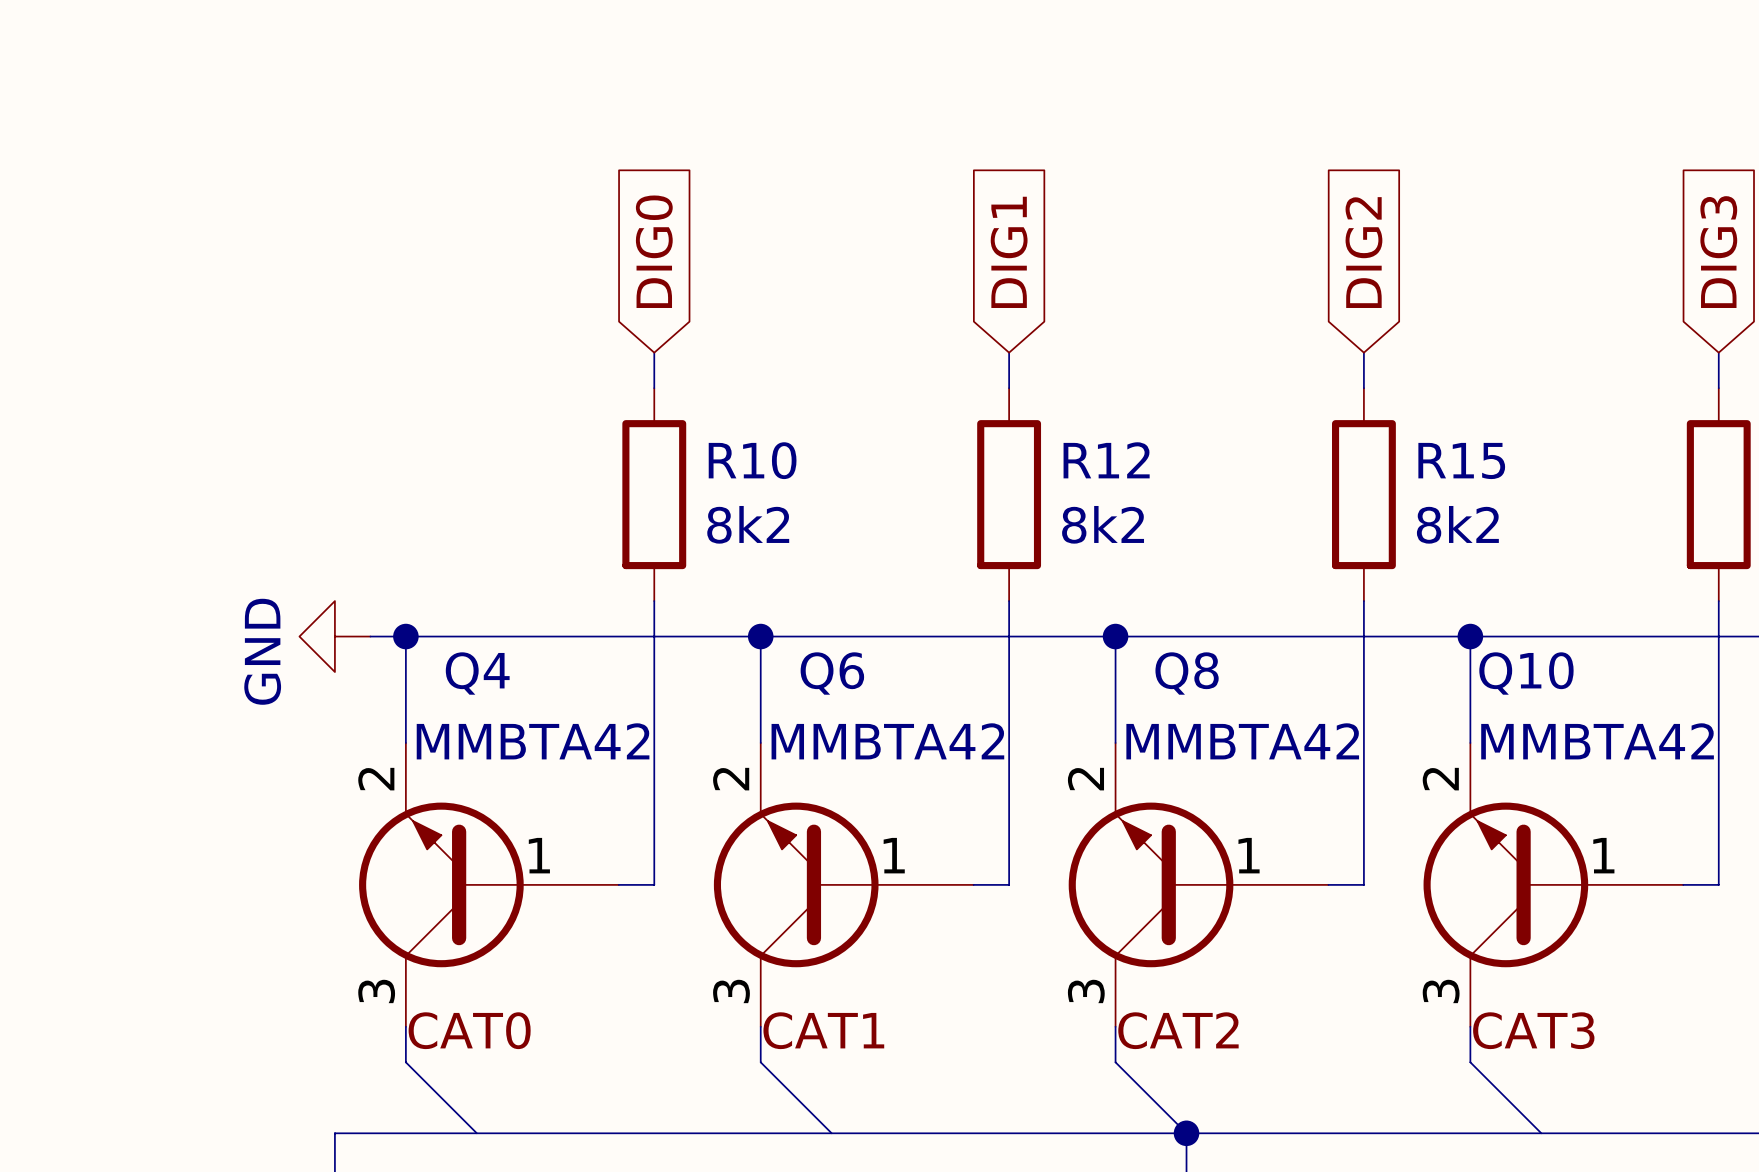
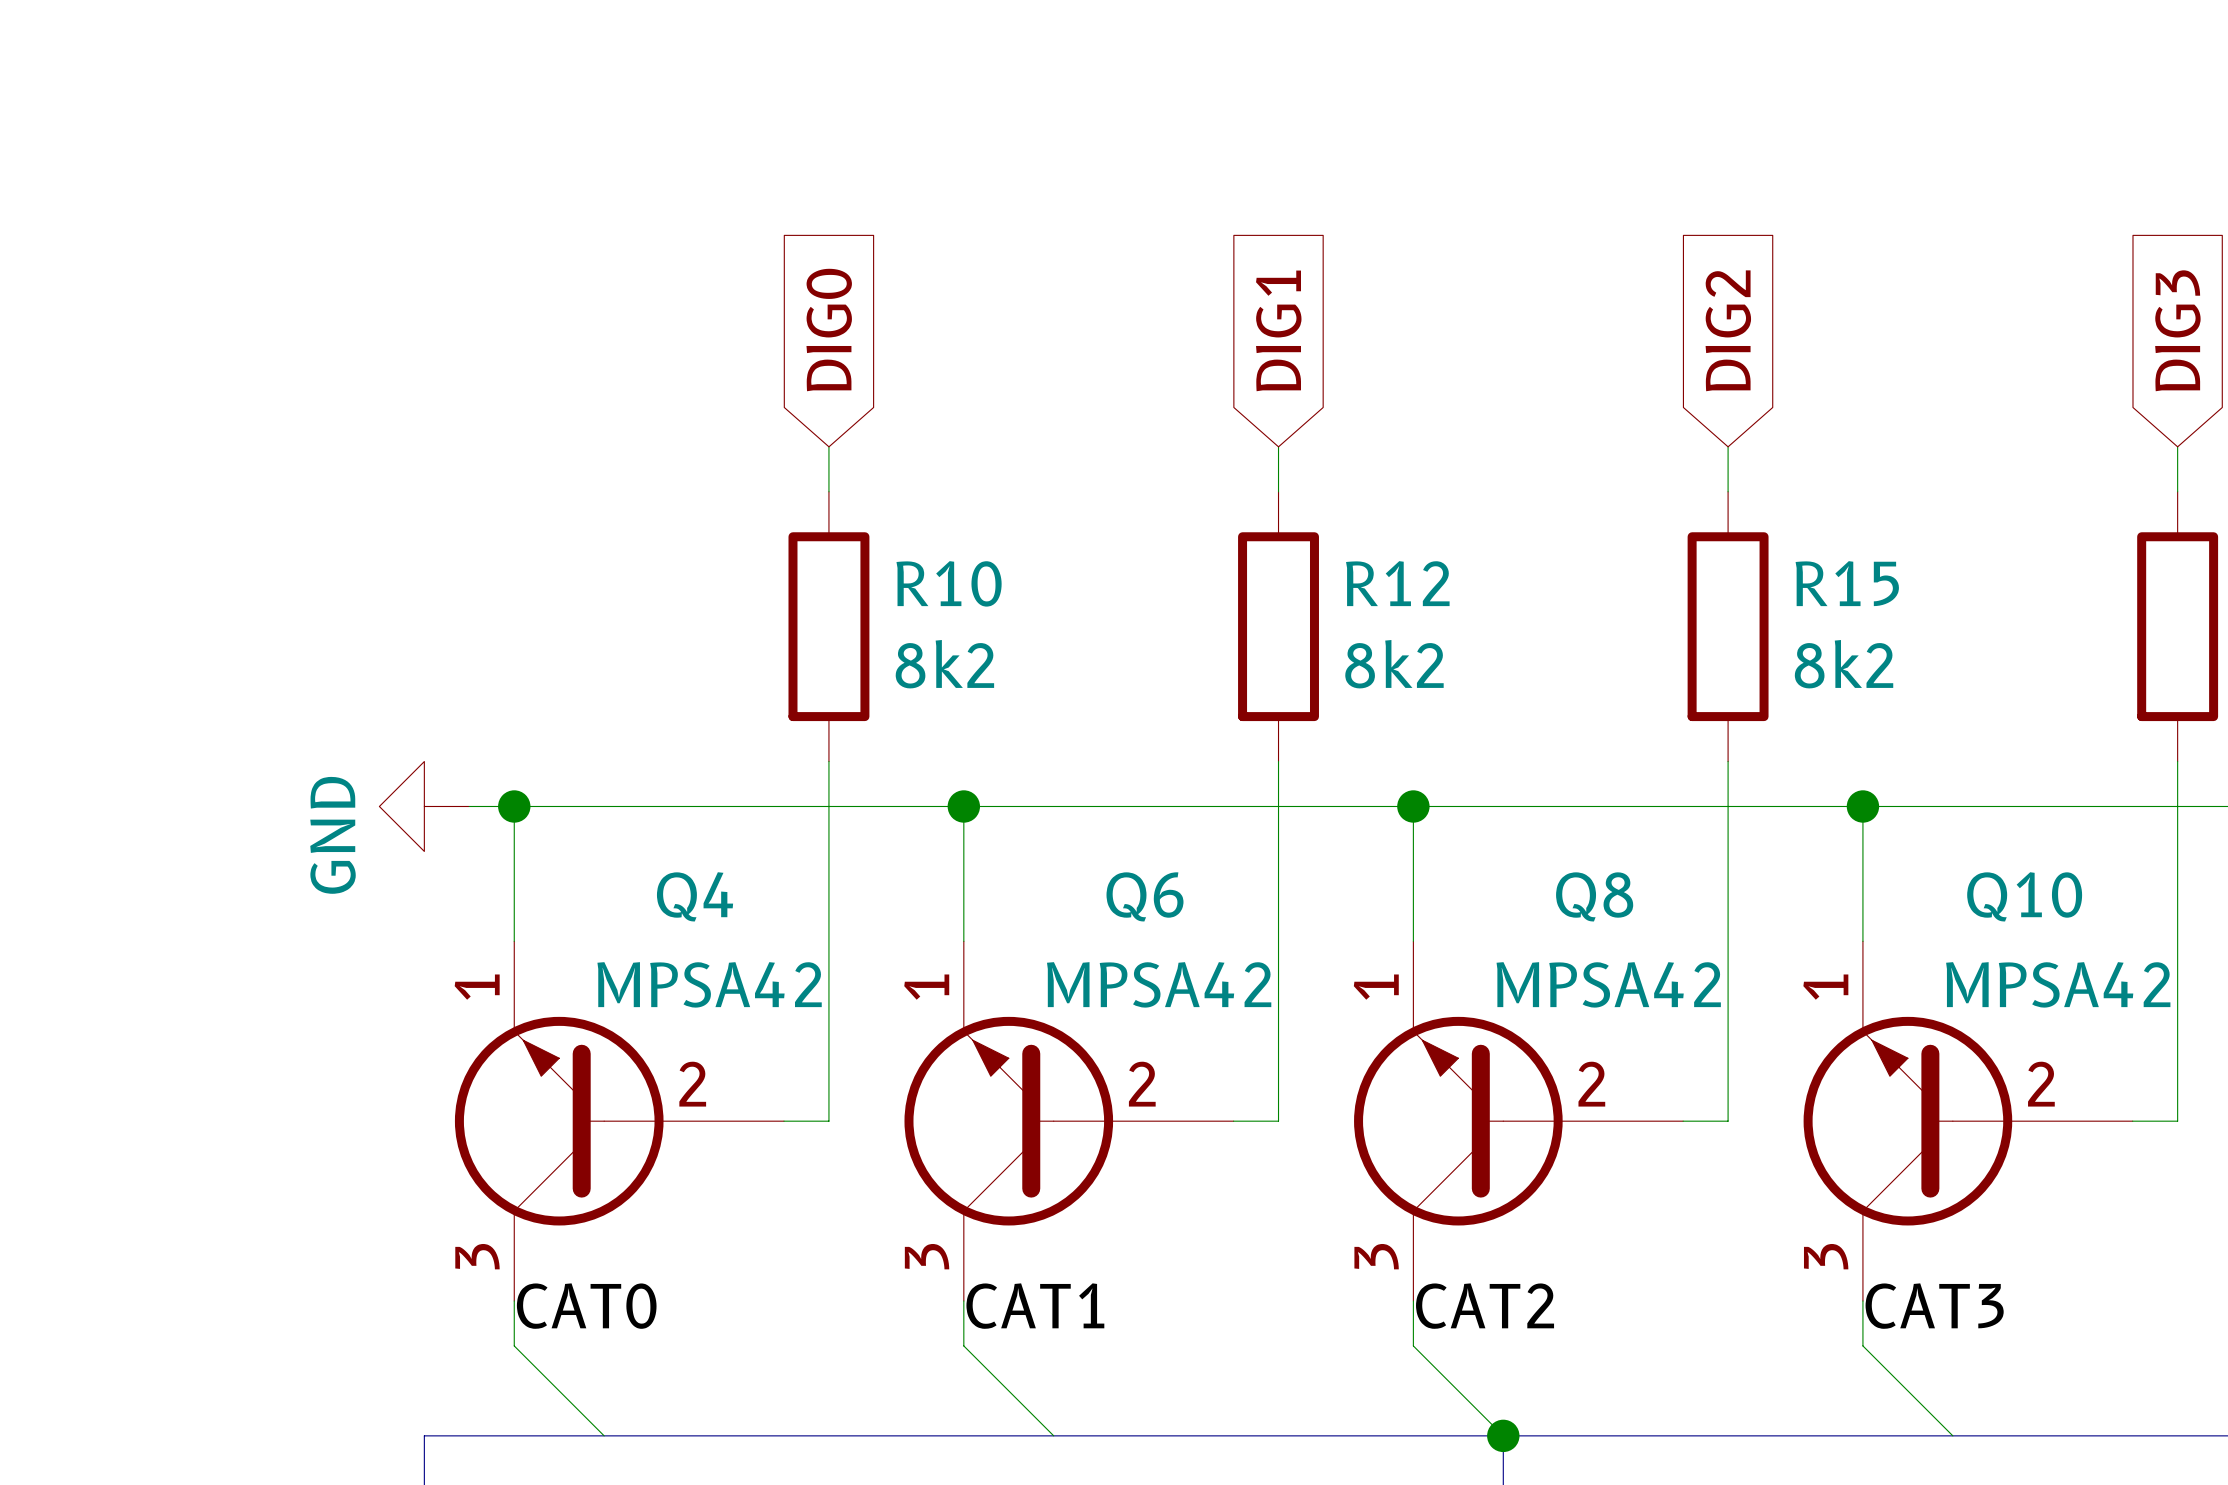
Q4 name position: Q4 (477, 673) -> Q4 (695, 896)
Q6 name position: Q6 (832, 673) -> Q6 (1144, 896)
Q8 name position: Q8 (1187, 673) -> Q8 (1594, 896)
Q10 name position: Q10 (1526, 673) -> Q10 (2024, 896)
Q4 value: MMBTA42 (533, 741) -> MPSA42 (709, 984)
Q6 value: MMBTA42 (887, 741) -> MPSA42 (1159, 984)
Q8 value: MMBTA42 (1242, 741) -> MPSA42 (1608, 984)
Q10 value: MMBTA42 (1597, 741) -> MPSA42 (2058, 984)
Q4 symbol: [359, 742, 619, 1027] -> [454, 941, 785, 1302]
Q6 symbol: [713, 742, 974, 1027] -> [904, 941, 1234, 1302]
Q8 symbol: [1068, 742, 1329, 1027] -> [1354, 941, 1684, 1302]
Q10 symbol: [1423, 742, 1684, 1027] -> [1803, 941, 2133, 1302]

